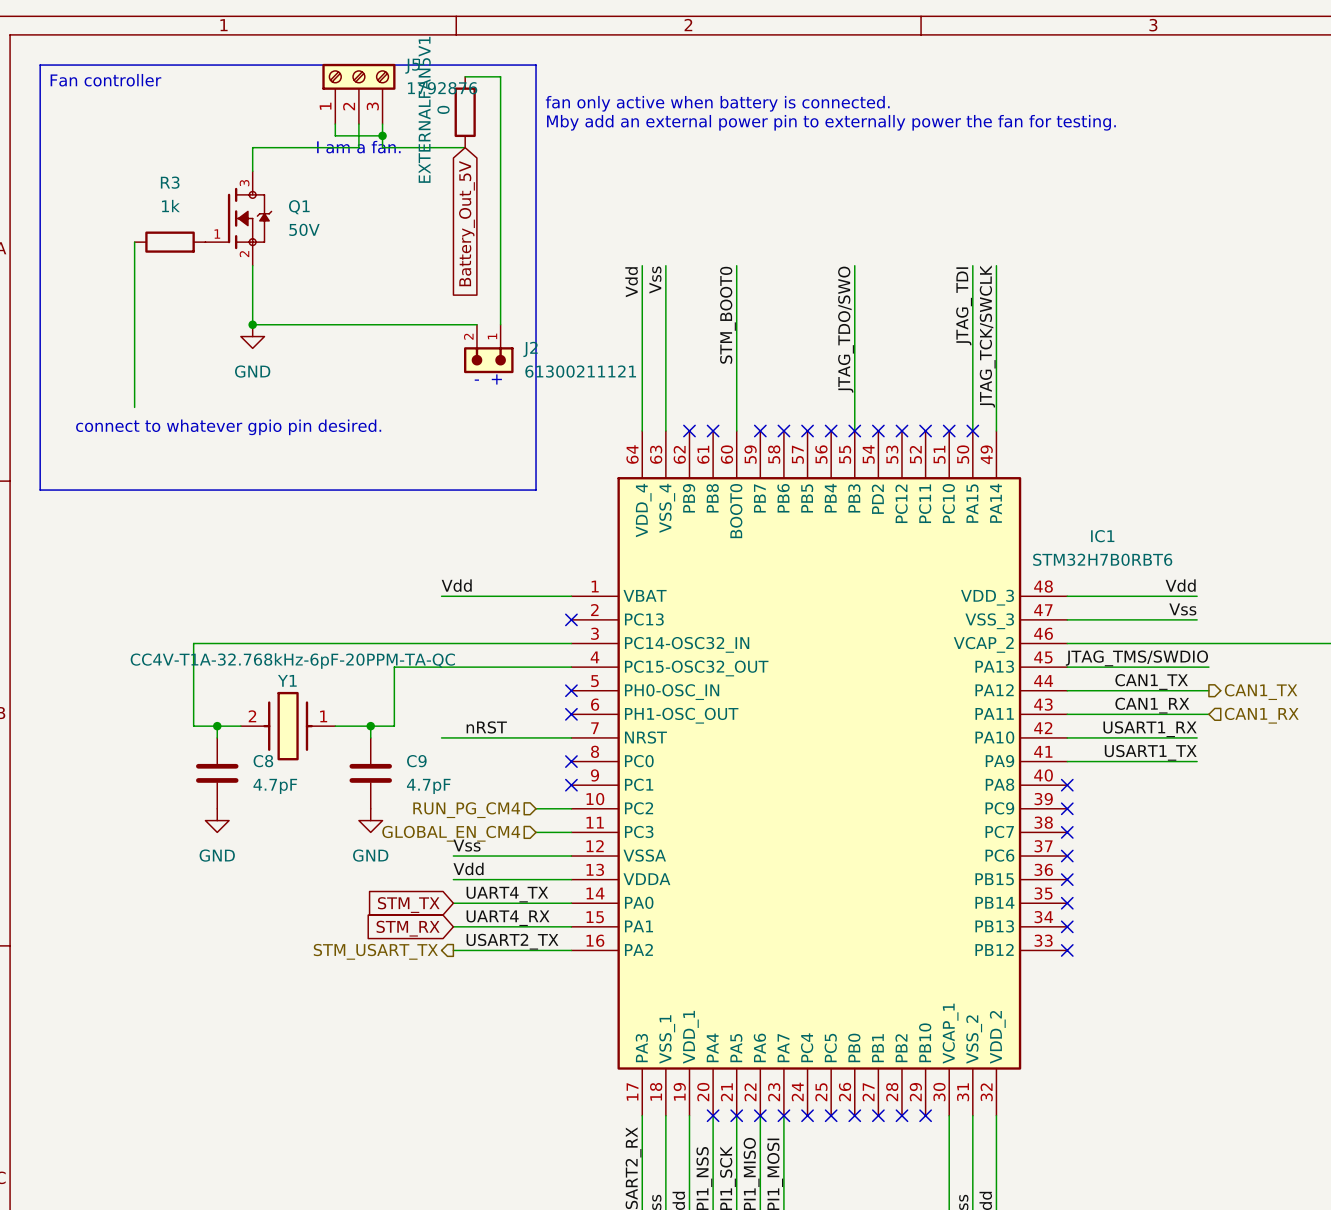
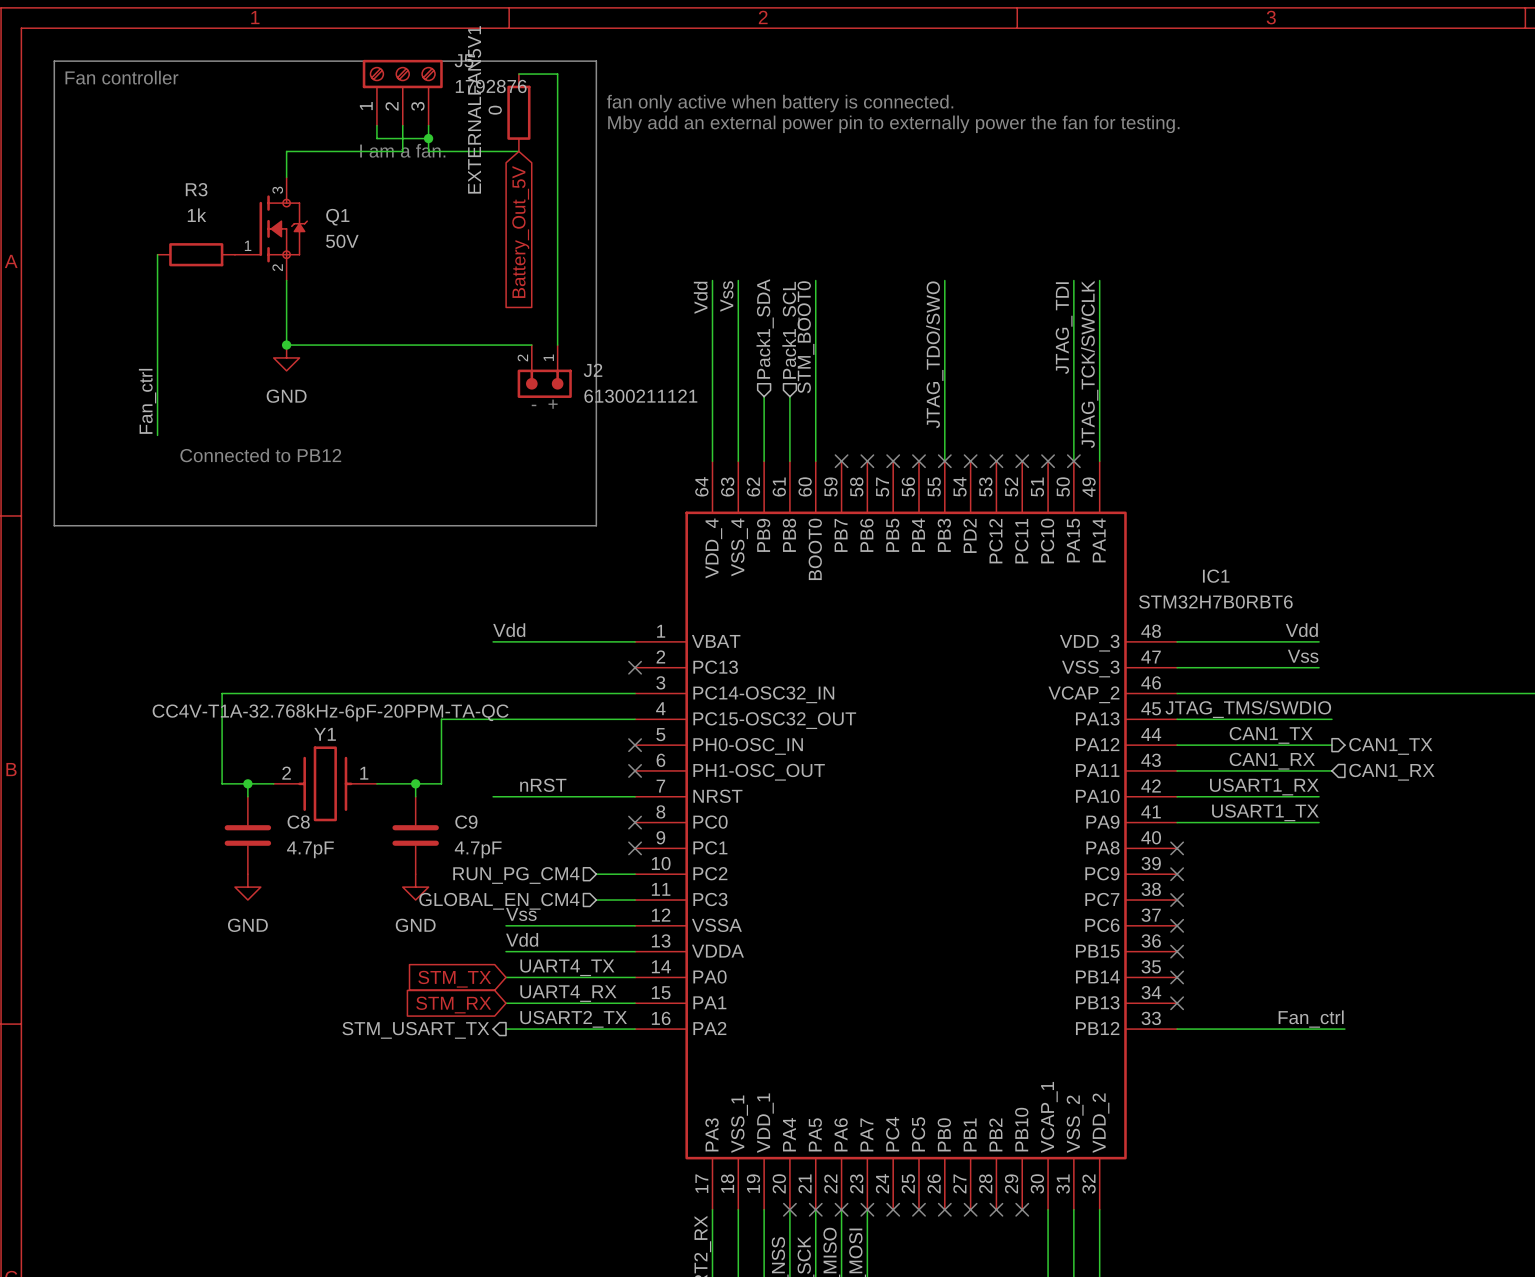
hierarchical label: none -> Pack1_SDA (765, 328)
hierarchical label: none -> Pack1_SCL (790, 330)
wire: none -> (764, 396) (764, 461)
wire: none -> (789, 396) (789, 461)
label: none -> Fan_ctrl (147, 401)
text: connect to whatever gpio pin desired. (228, 427) -> Connected to PB12 (260, 455)
no-connect mark: (689, 431) -> none
no-connect mark: (713, 431) -> none
label: none -> Fan_ctrl (1311, 1019)
wire: none -> (1177, 1029) (1344, 1029)
no-connect mark: (1067, 950) -> none

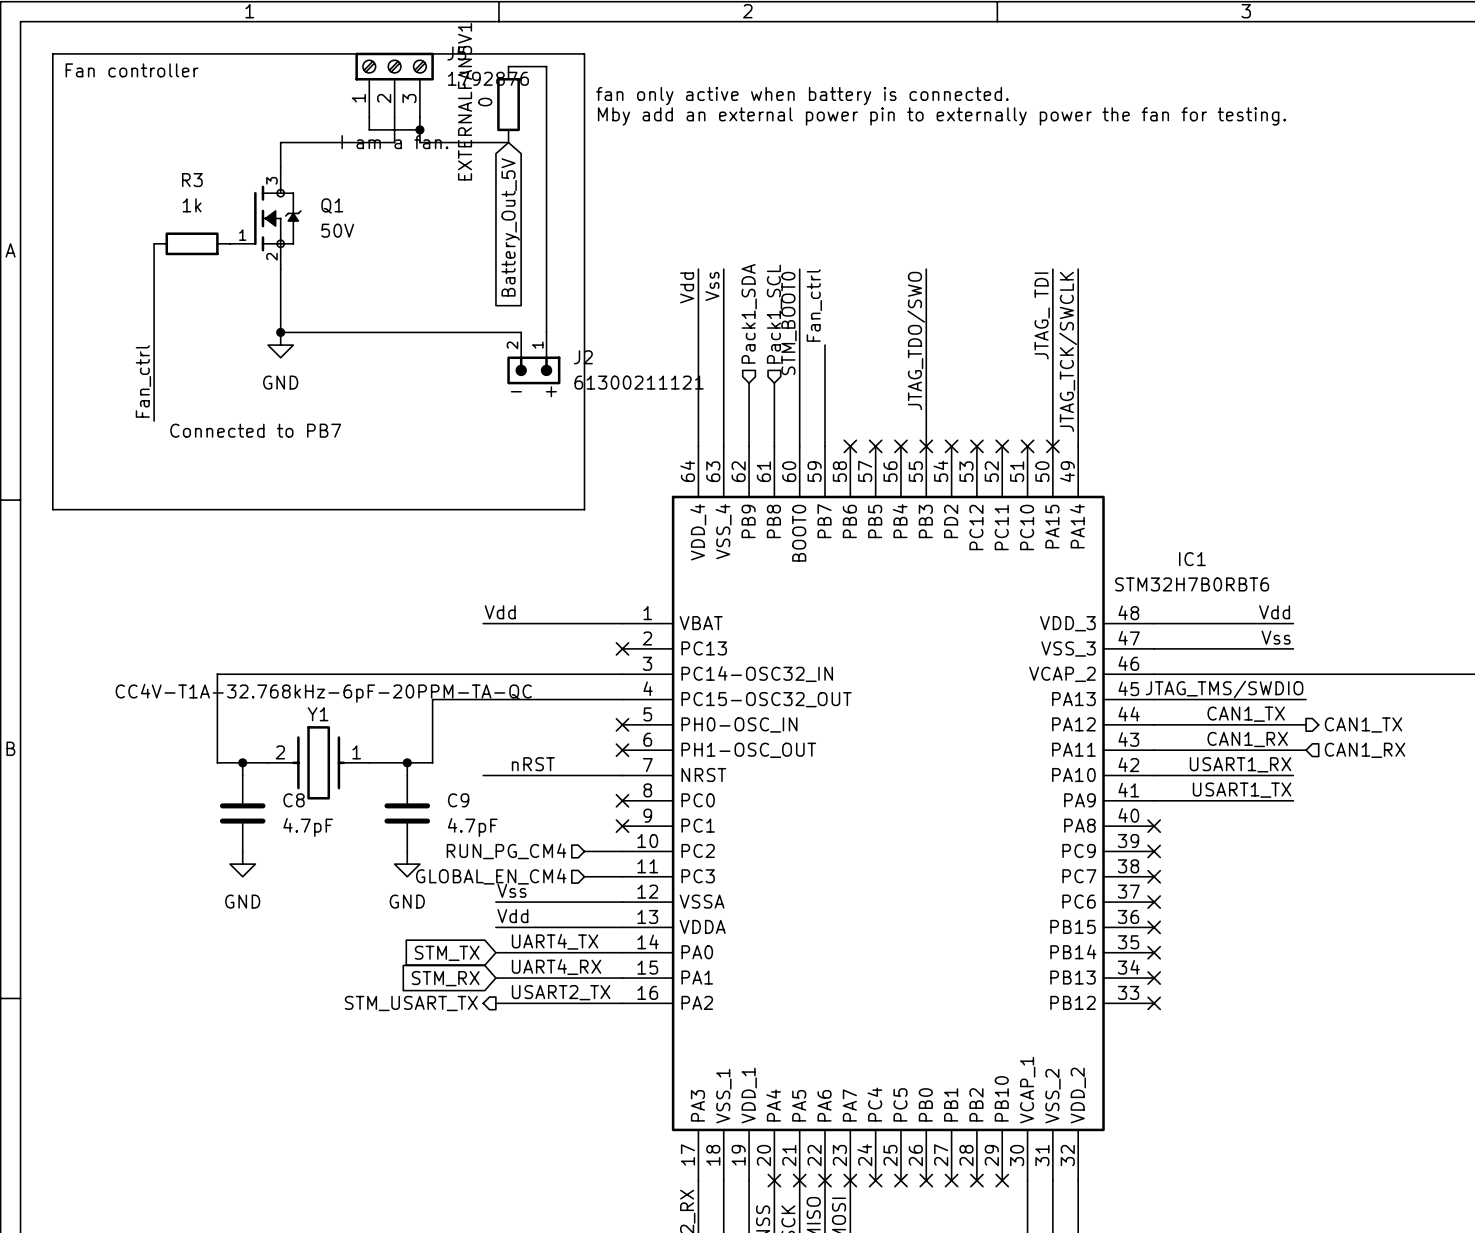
label: none -> Fan_ctrl (814, 305)
wire: none -> (825, 345) (825, 446)
text: Connected to PB12 (260, 455) -> Connected to PB7 (255, 430)
no-connect mark: (841, 461) -> none
label: Fan_ctrl (1311, 1019) -> none
wire: (1177, 1029) (1344, 1029) -> none
no-connect mark: none -> (1154, 1003)

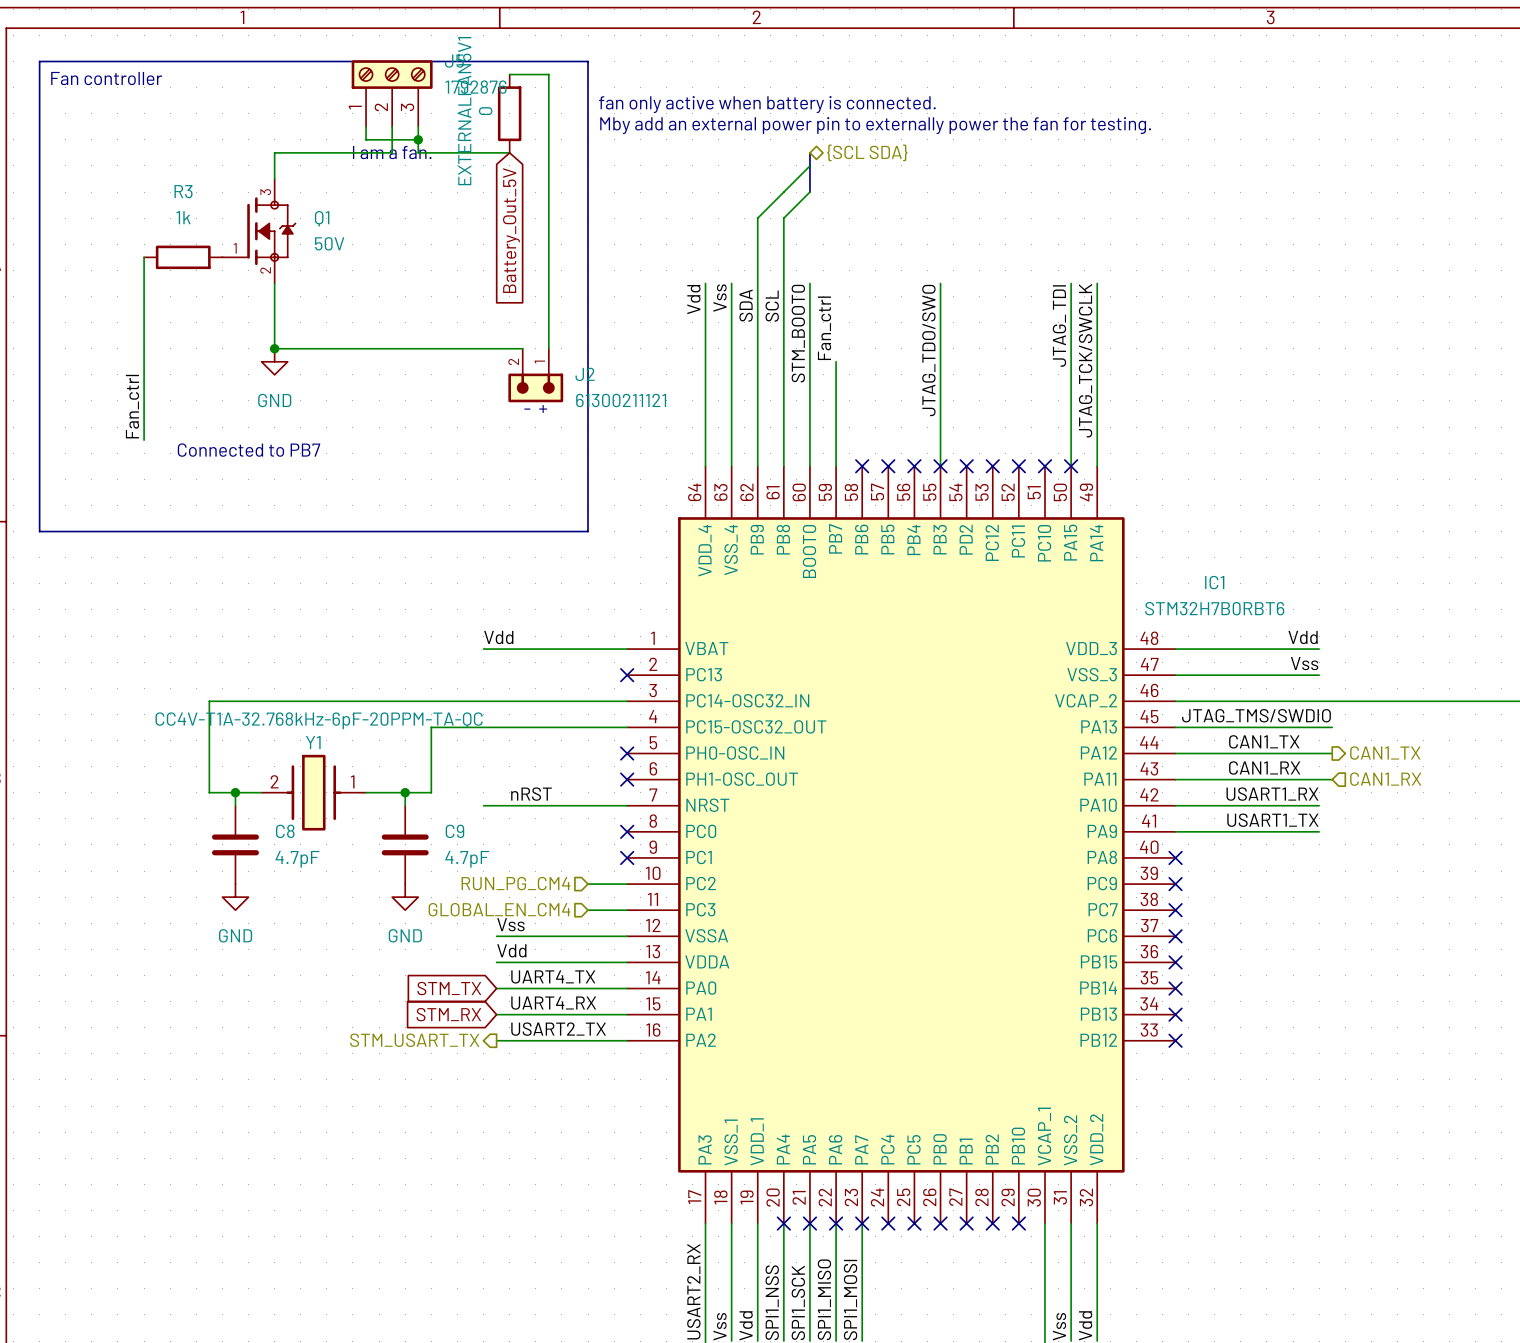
bus: none -> (809, 152) (809, 192)
hierarchical label: none -> {SCL SDA} (867, 152)
wire: none -> (809, 165) (757, 218) (757, 400)
wire: none -> (809, 192) (783, 218) (783, 400)
label: none -> SDA (746, 305)
label: none -> SCL (772, 306)
hierarchical label: Pack1_SDA (749, 313) -> none
hierarchical label: Pack1_SCL (774, 314) -> none

